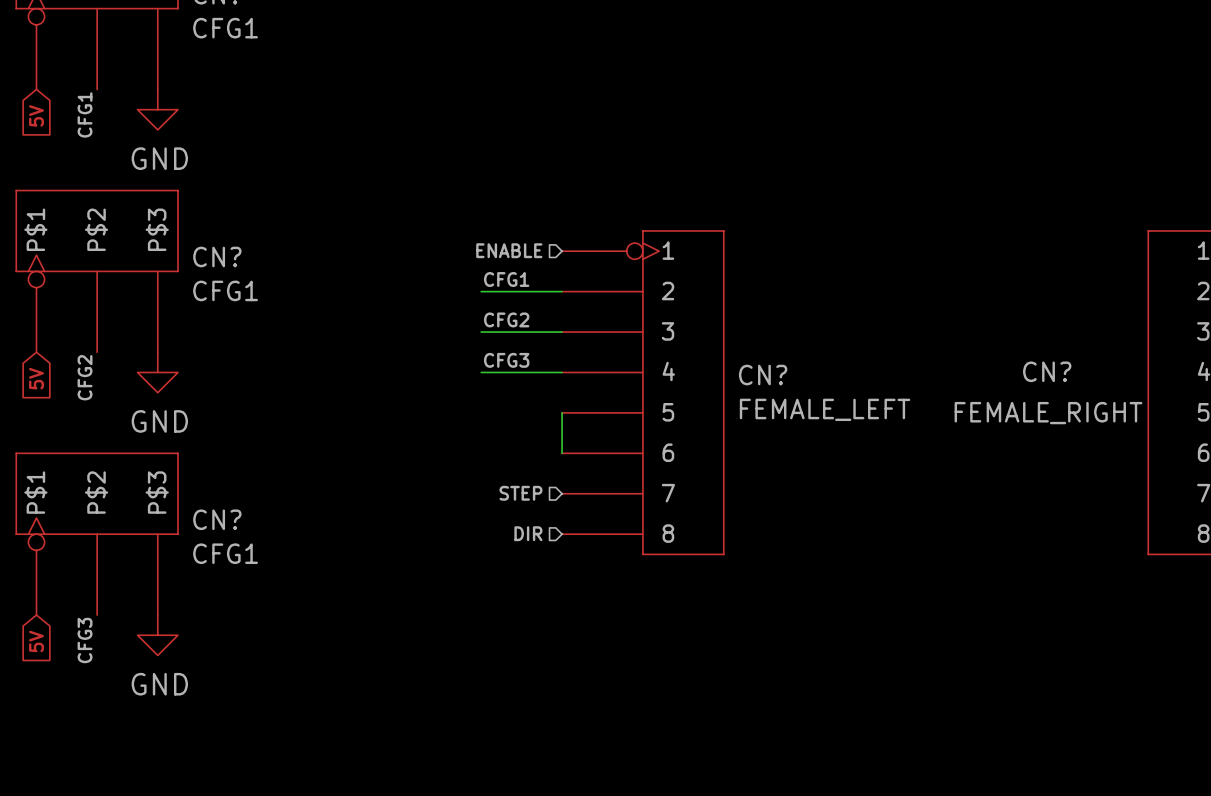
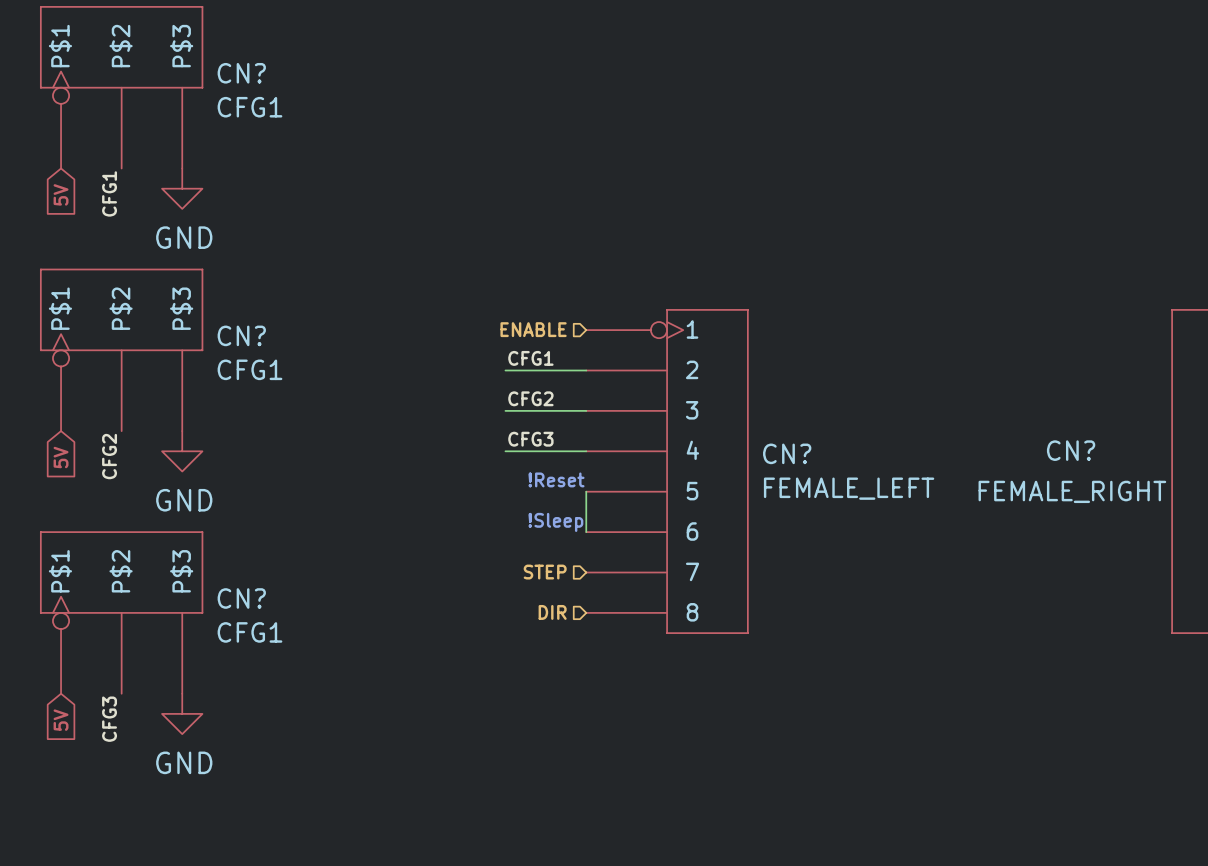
text: none -> !Reset (556, 479)
text: none -> !Sleep (555, 522)

